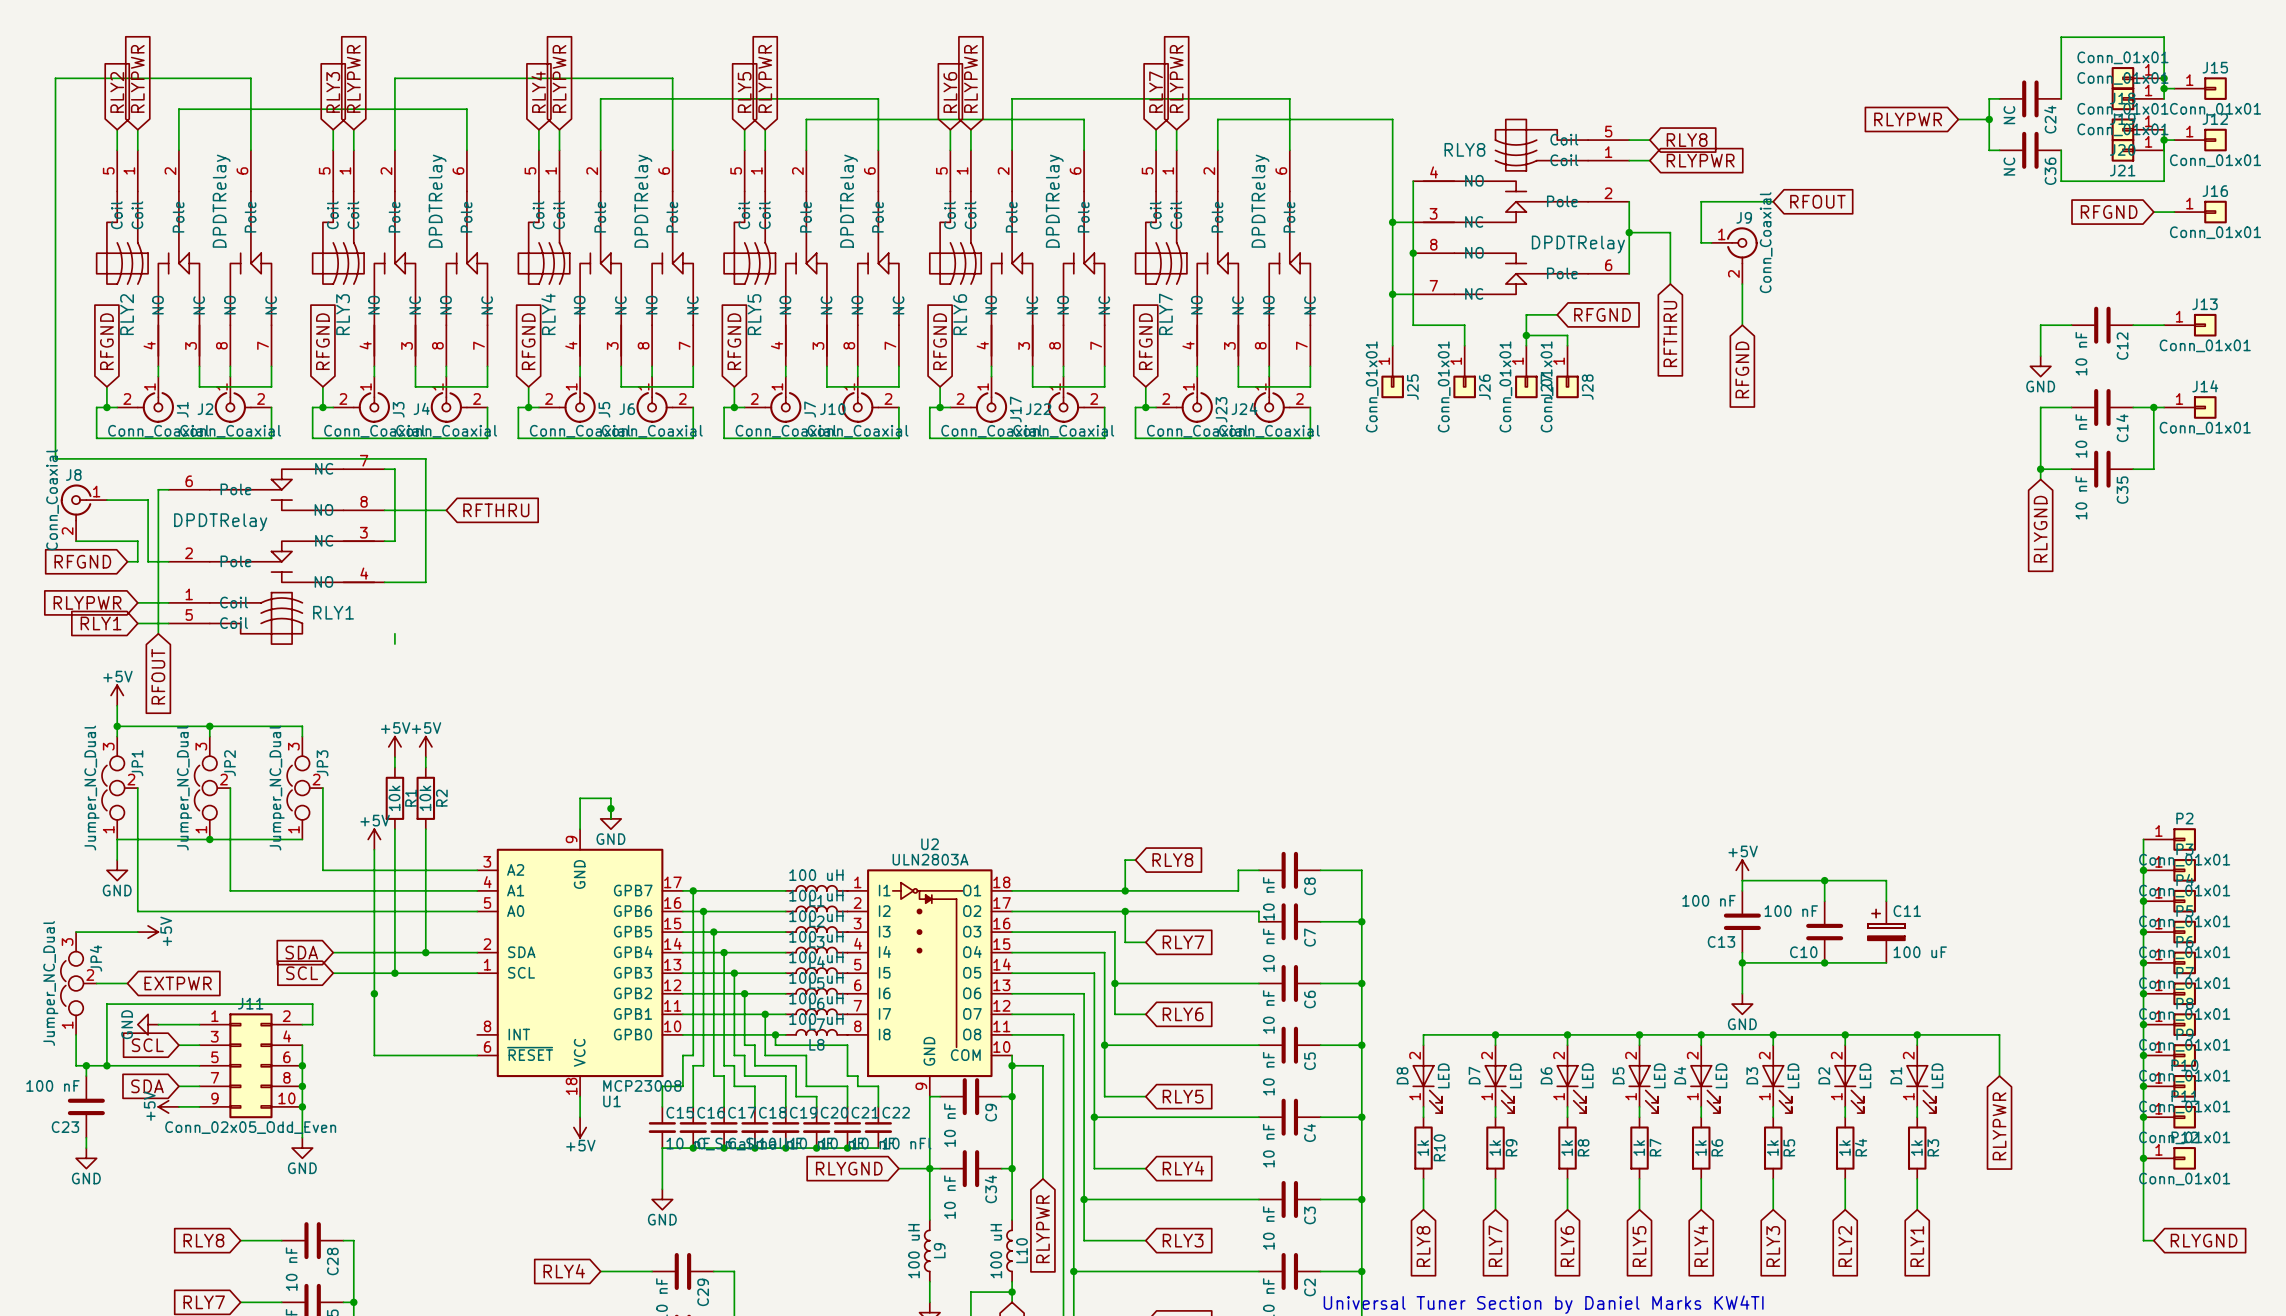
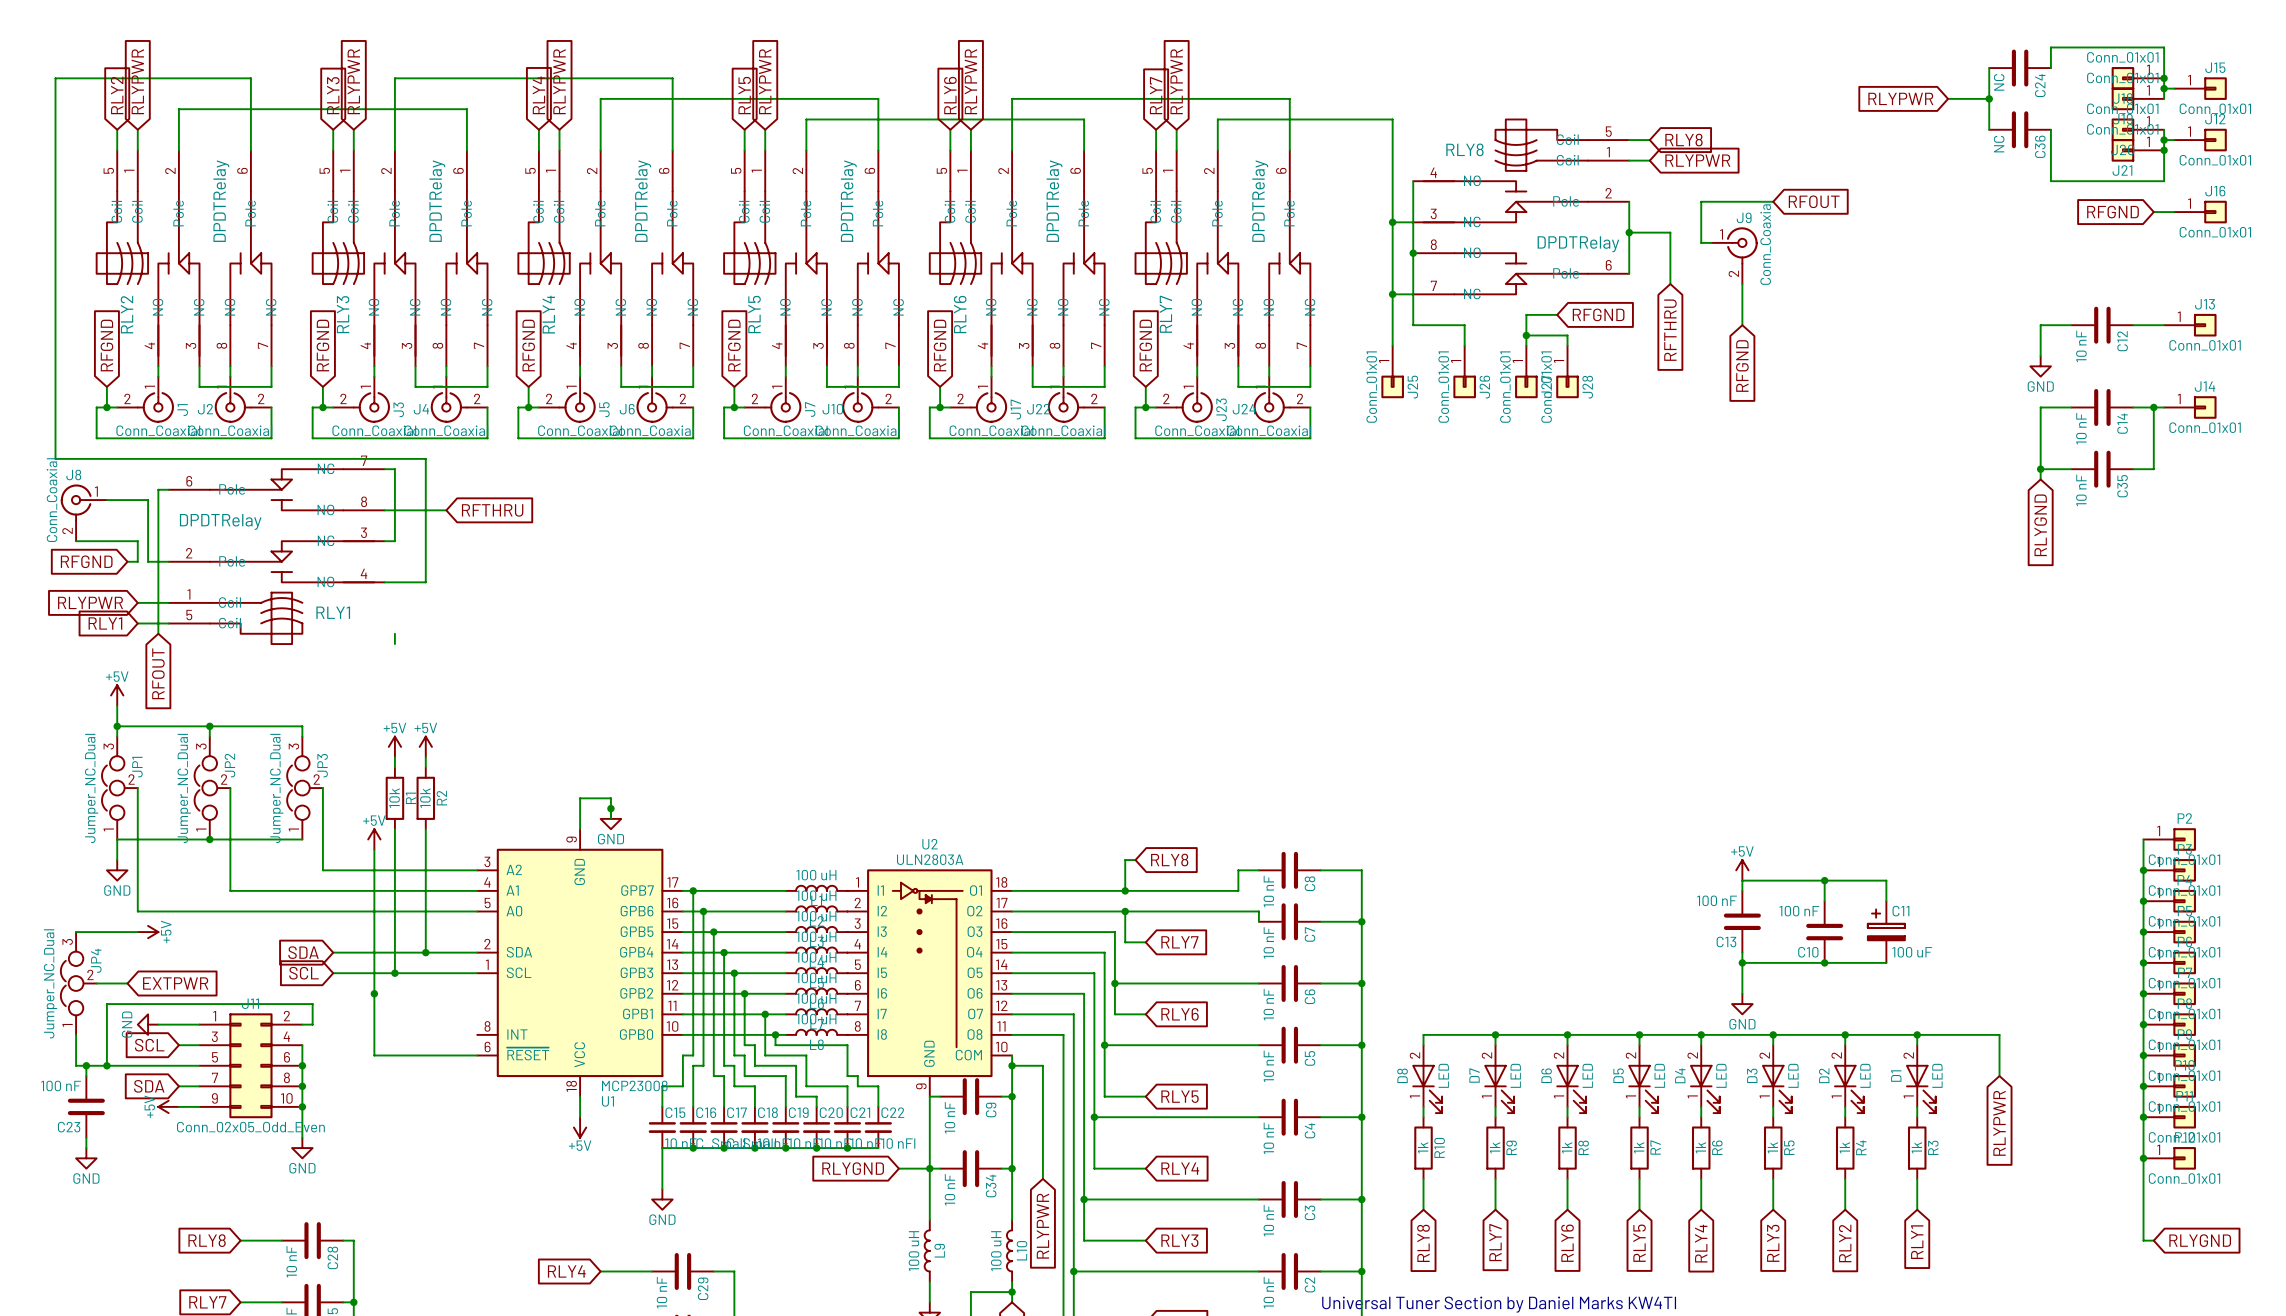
wire: (2164, 47) (2164, 37) (2061, 37) (2061, 98) -> (2164, 47) (2050, 47) (2050, 68)
wire: none -> (1989, 68) (1989, 98) (1948, 98)
wire: (1989, 98) (1999, 98) -> none
C24 position: (2030, 98) -> (2020, 68)
global label position: RLYPWR (1908, 119) -> RLYPWR (1900, 98)
wire: (1958, 119) (1989, 119) -> none
junction position: (1989, 119) -> (1989, 98)
wire: (1989, 129) (1989, 150) (1999, 150) -> none
C36 position: (2030, 150) -> (2020, 129)
wire: (2061, 150) (2061, 181) -> (2050, 129) (2050, 181) (2061, 181)
junction: none -> (2164, 150)

